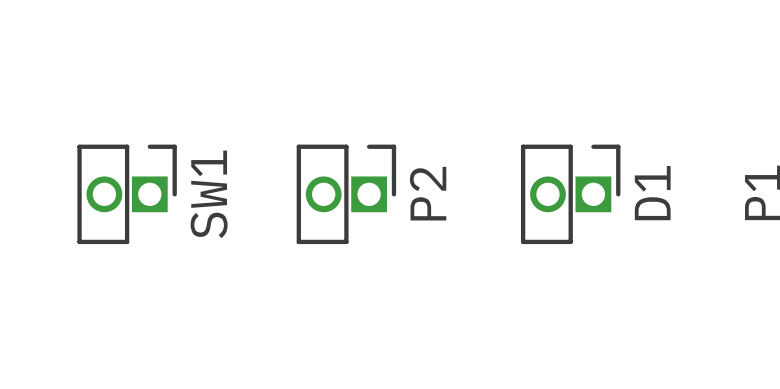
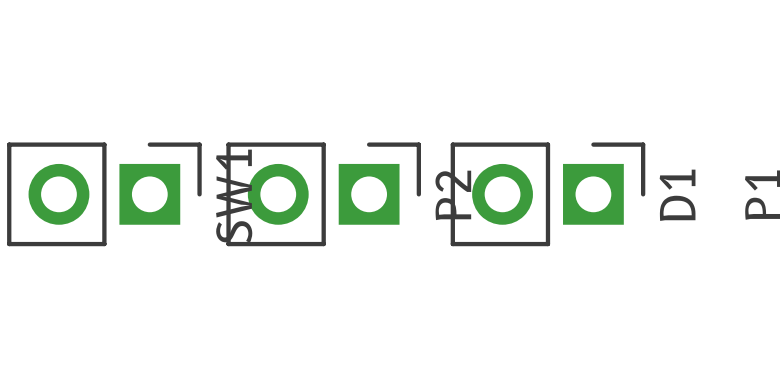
SW1 footprint: [77, 144, 177, 245] -> [7, 142, 202, 247]
P2 footprint: [296, 144, 397, 245] -> [226, 142, 421, 247]
D1 footprint: [520, 144, 621, 245] -> [450, 142, 646, 247]

